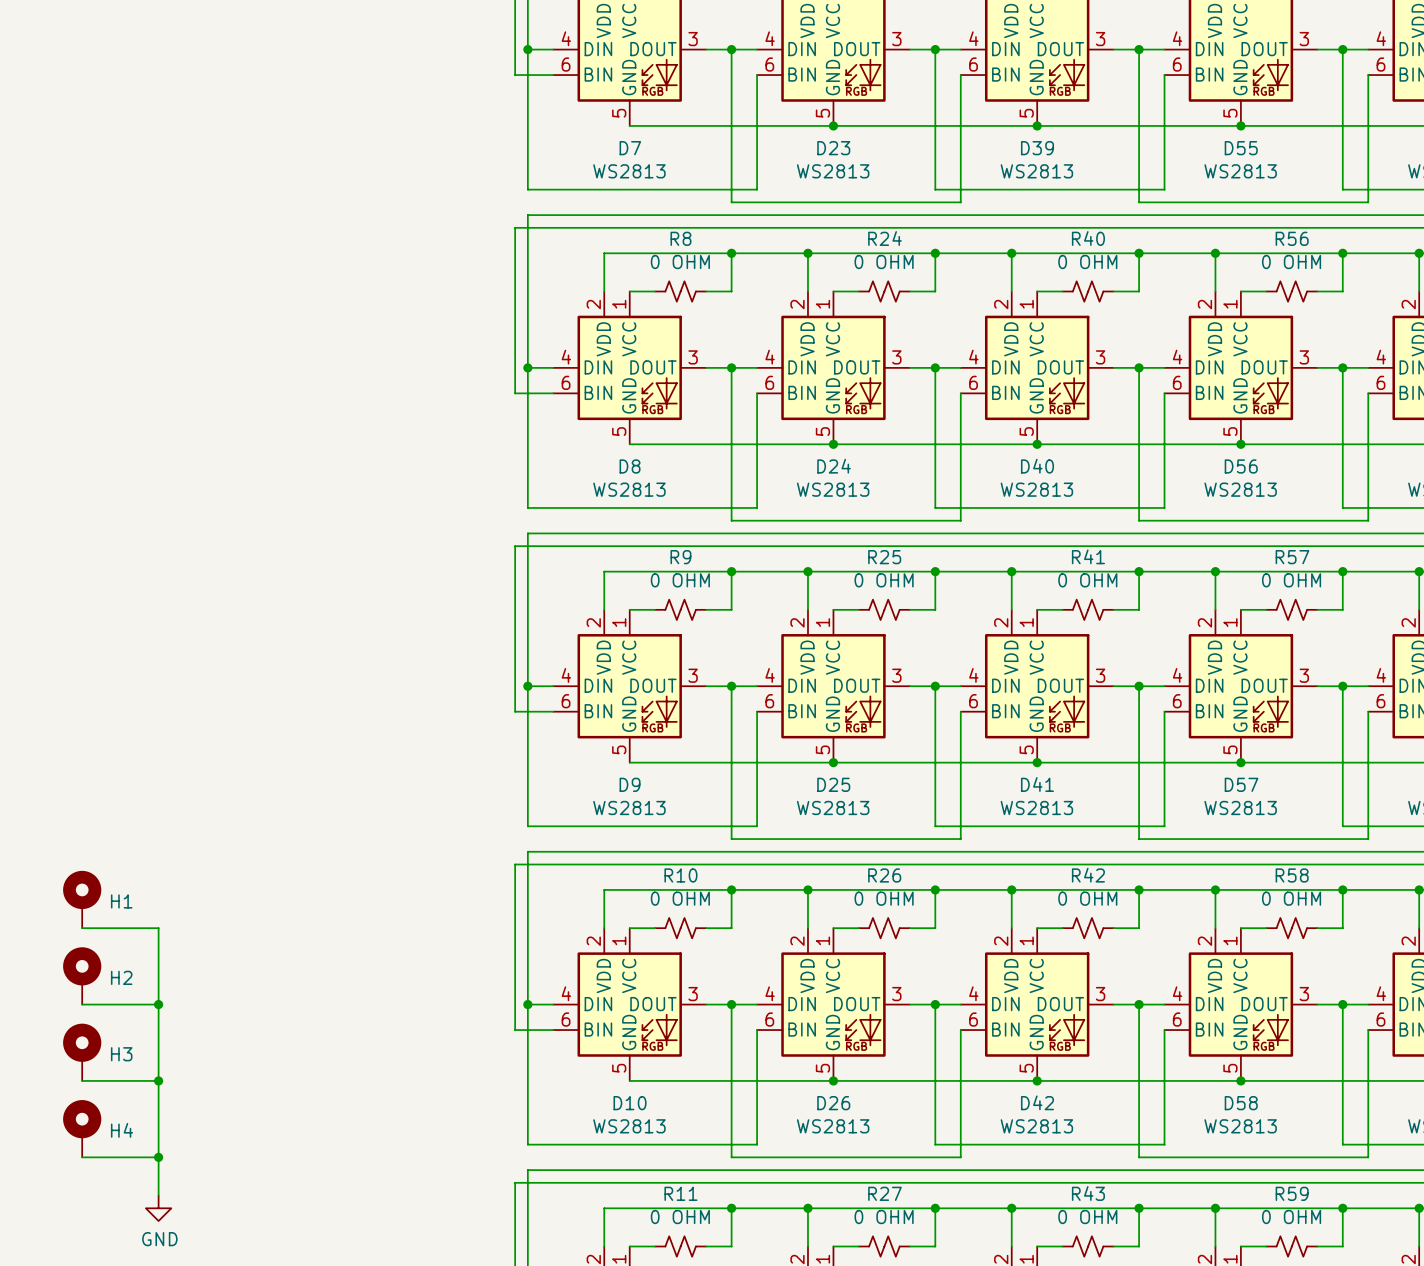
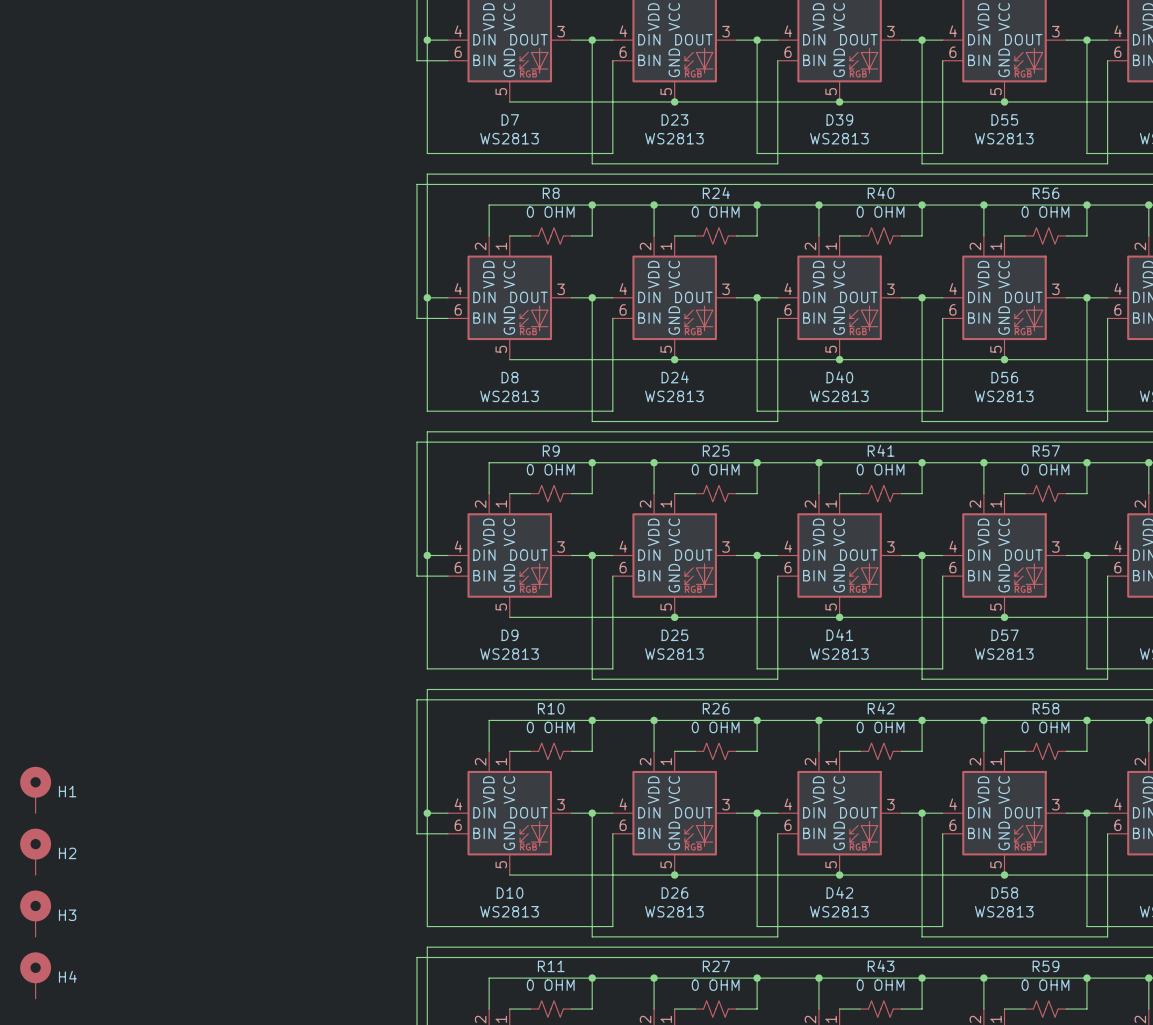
H1 position: (82, 899) -> (35, 789)
wire: (82, 928) (158, 928) (158, 1195) -> none
H2 position: (82, 975) -> (35, 851)
wire: (82, 1004) (158, 1004) -> none
junction: (158, 1004) -> none
H3 position: (82, 1052) -> (35, 913)
wire: (82, 1080) (158, 1080) -> none
junction: (158, 1080) -> none
H4 position: (82, 1128) -> (35, 975)
wire: (82, 1157) (158, 1157) -> none
junction: (158, 1157) -> none
power symbol: GND (158, 1208) -> none

